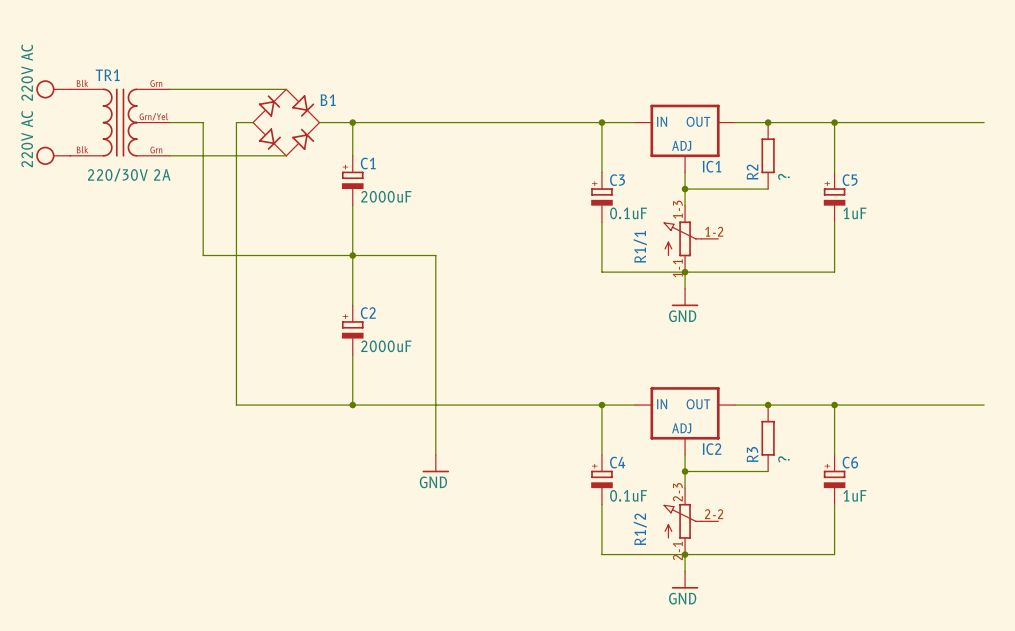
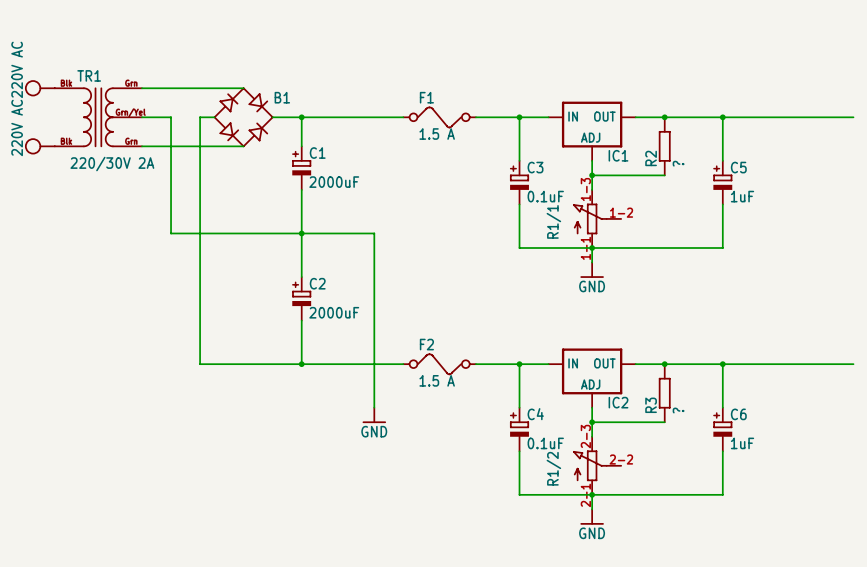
wire: (469, 122) (552, 122) -> none
F1: none -> 1.5 A (439, 117)
wire: (469, 405) (552, 405) -> none
F2: none -> 1.5 A (439, 364)

